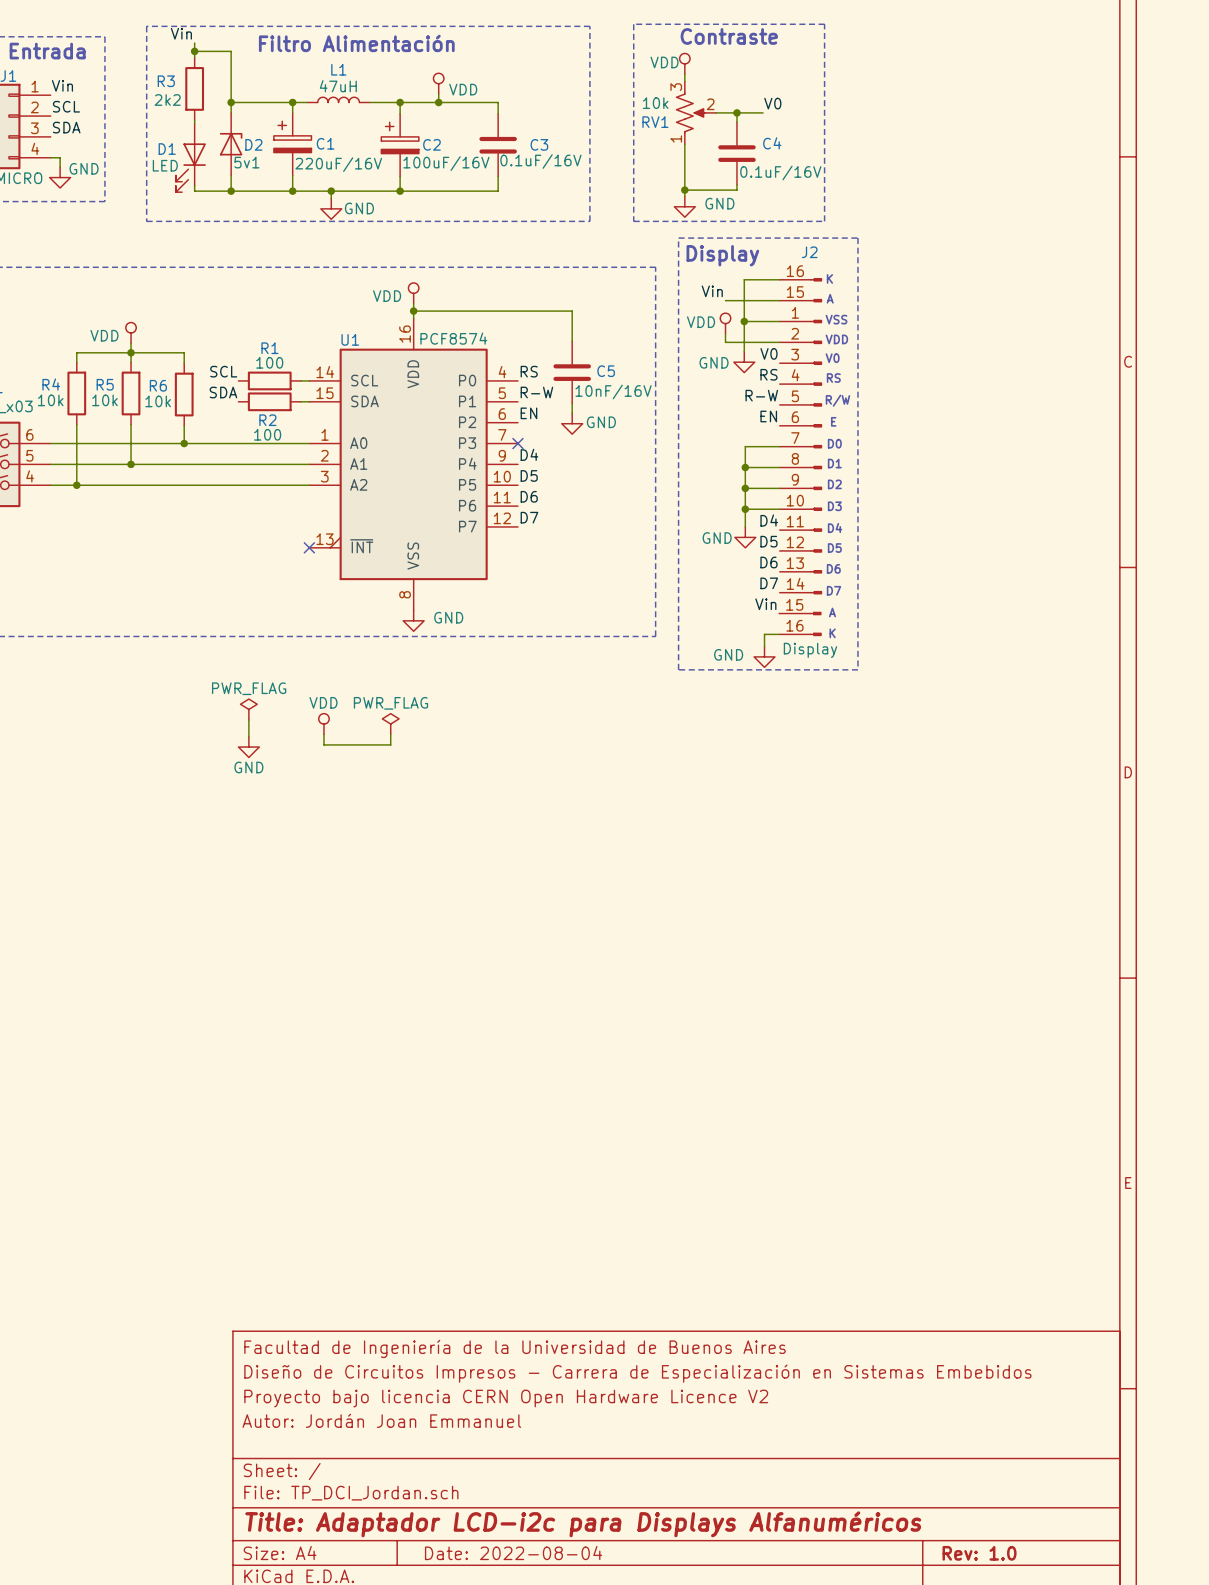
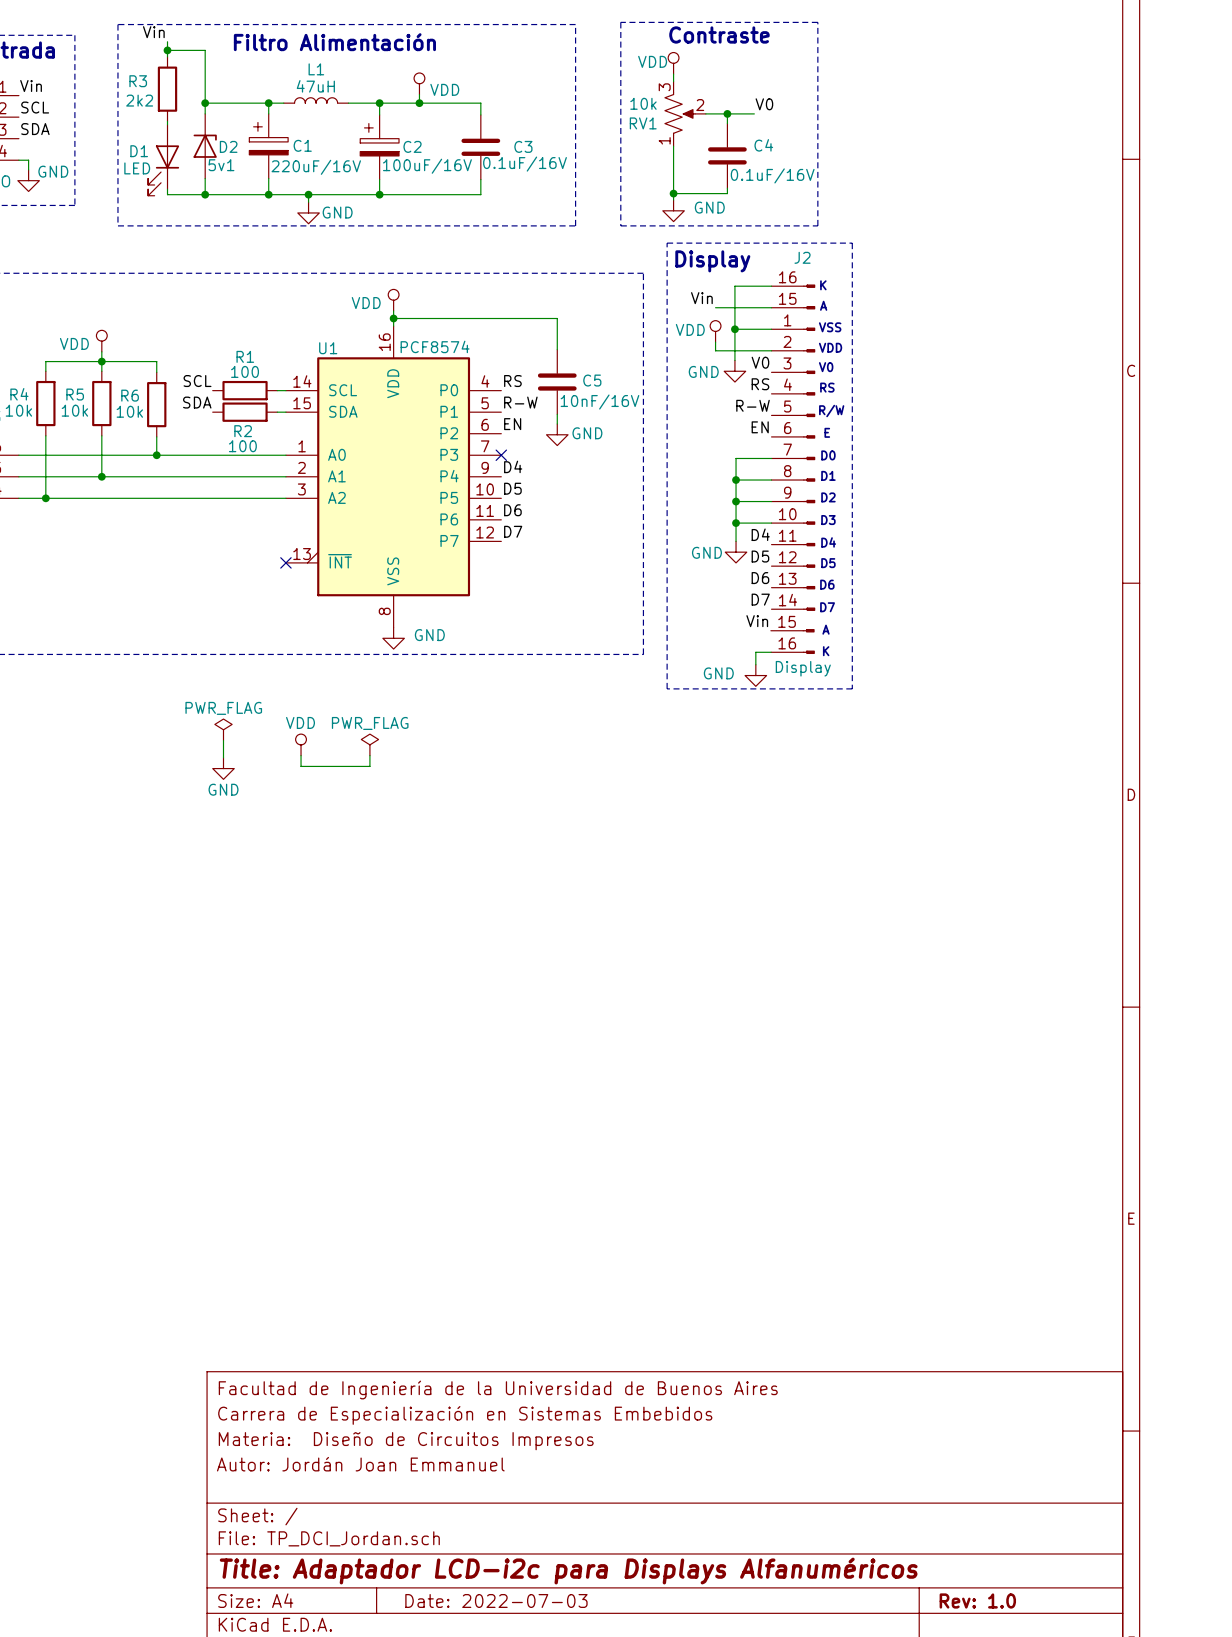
title block: Diseño de Circuitos Impresos - Carrera de Especialización en Sistemas Embebidos (637, 1373) -> Carrera de Especialización en Sistemas Embebidos (465, 1415)
title block: Proyecto bajo licencia CERN Open Hardware Licence V2 (506, 1398) -> Materia: Diseño de Circuitos Impresos (406, 1441)
title block: Date: 2022-08-04 (513, 1553) -> Date: 2022-07-03 (496, 1600)

